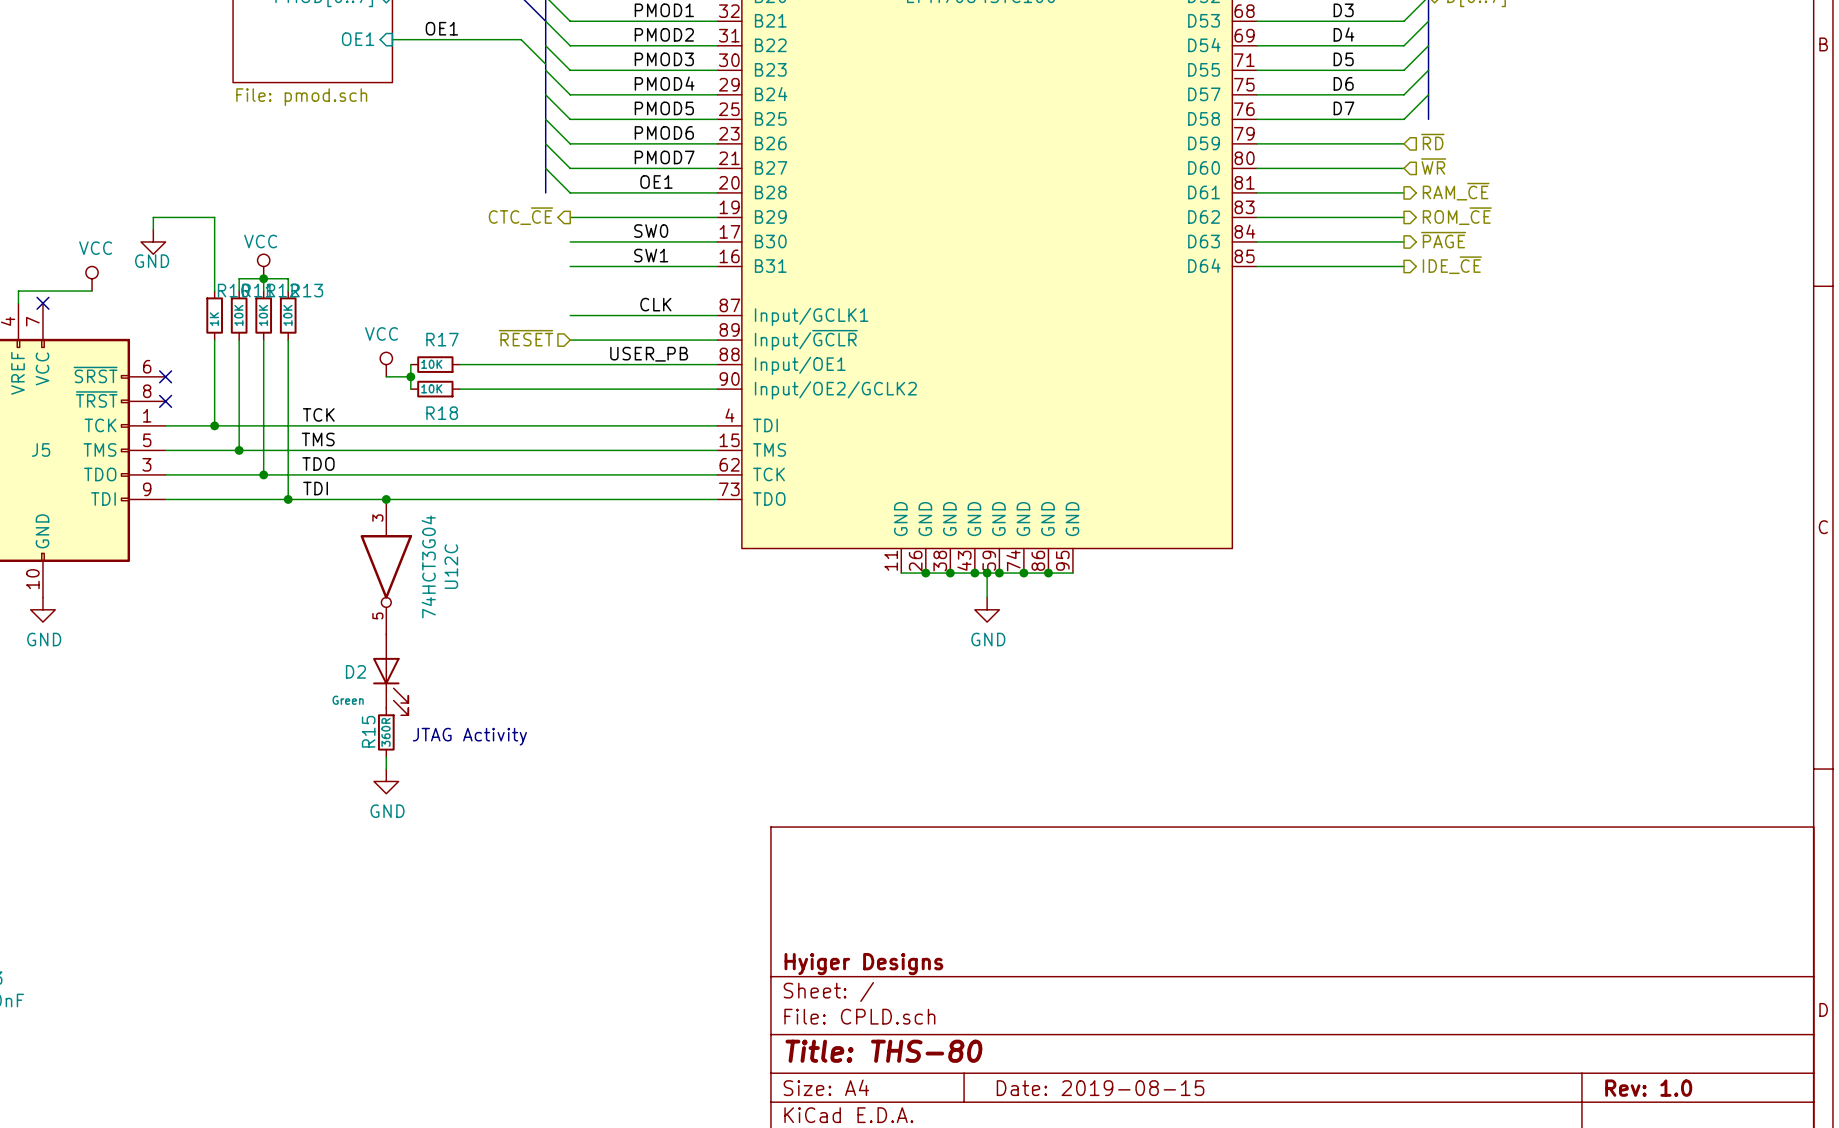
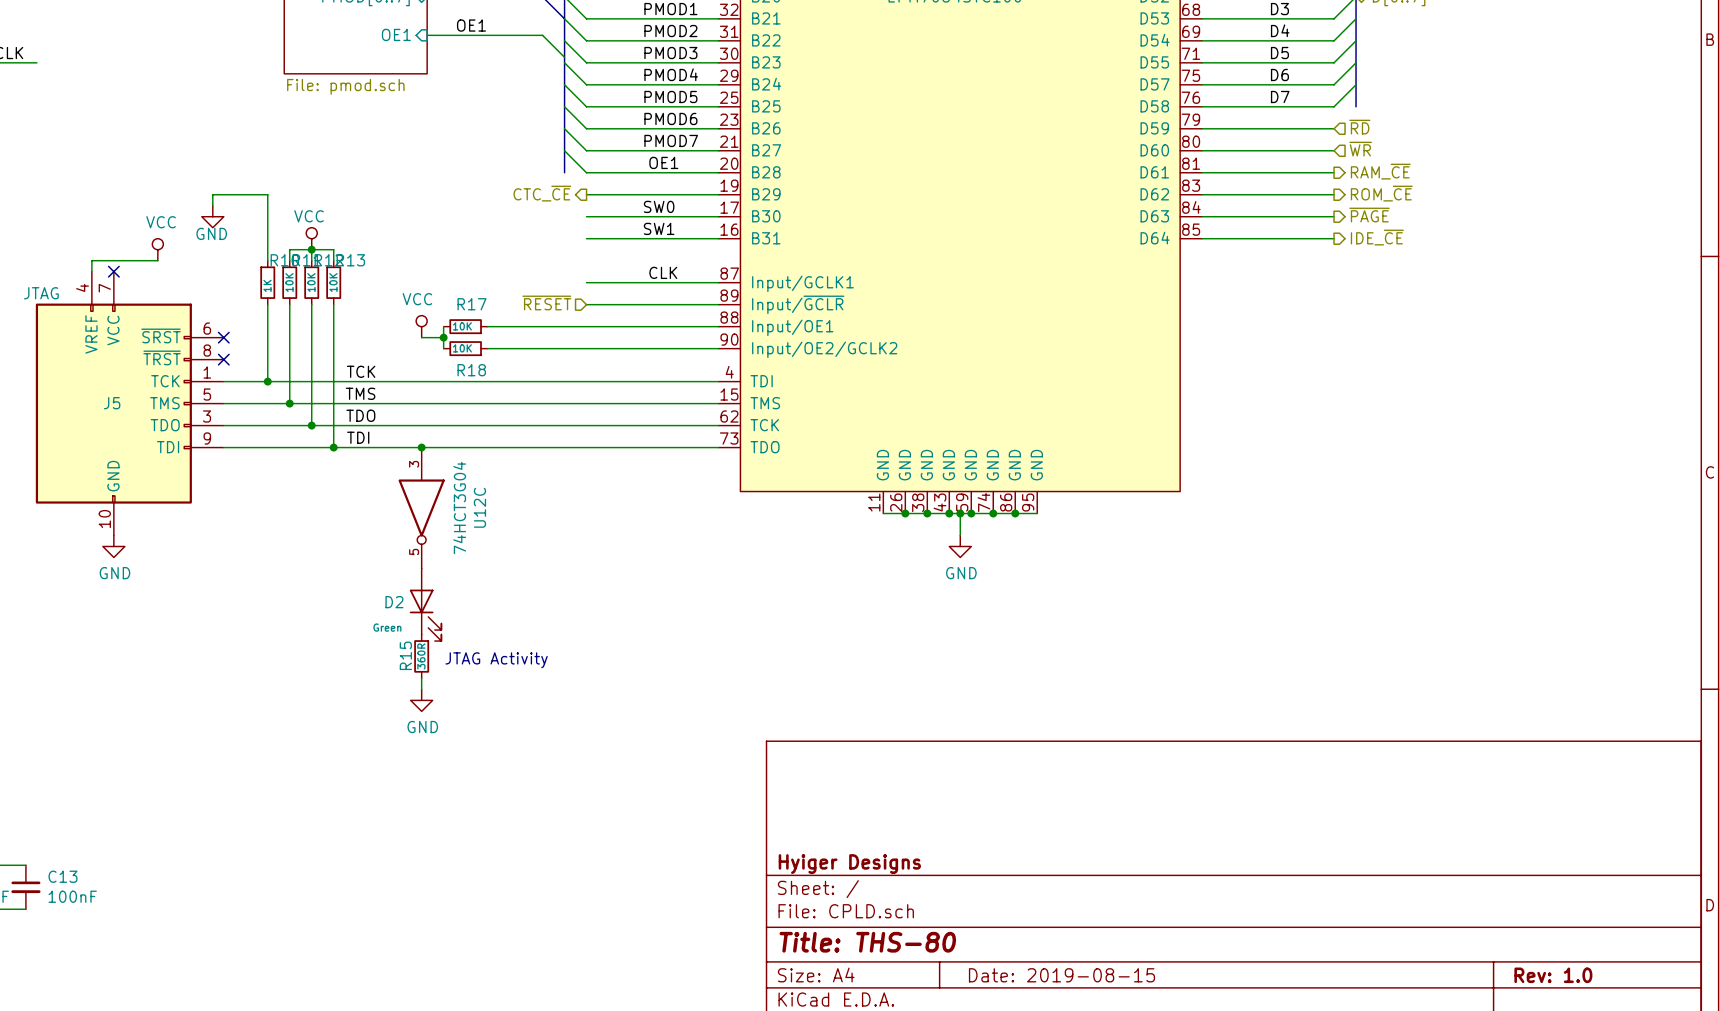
label: USER_PB (649, 354) -> none

